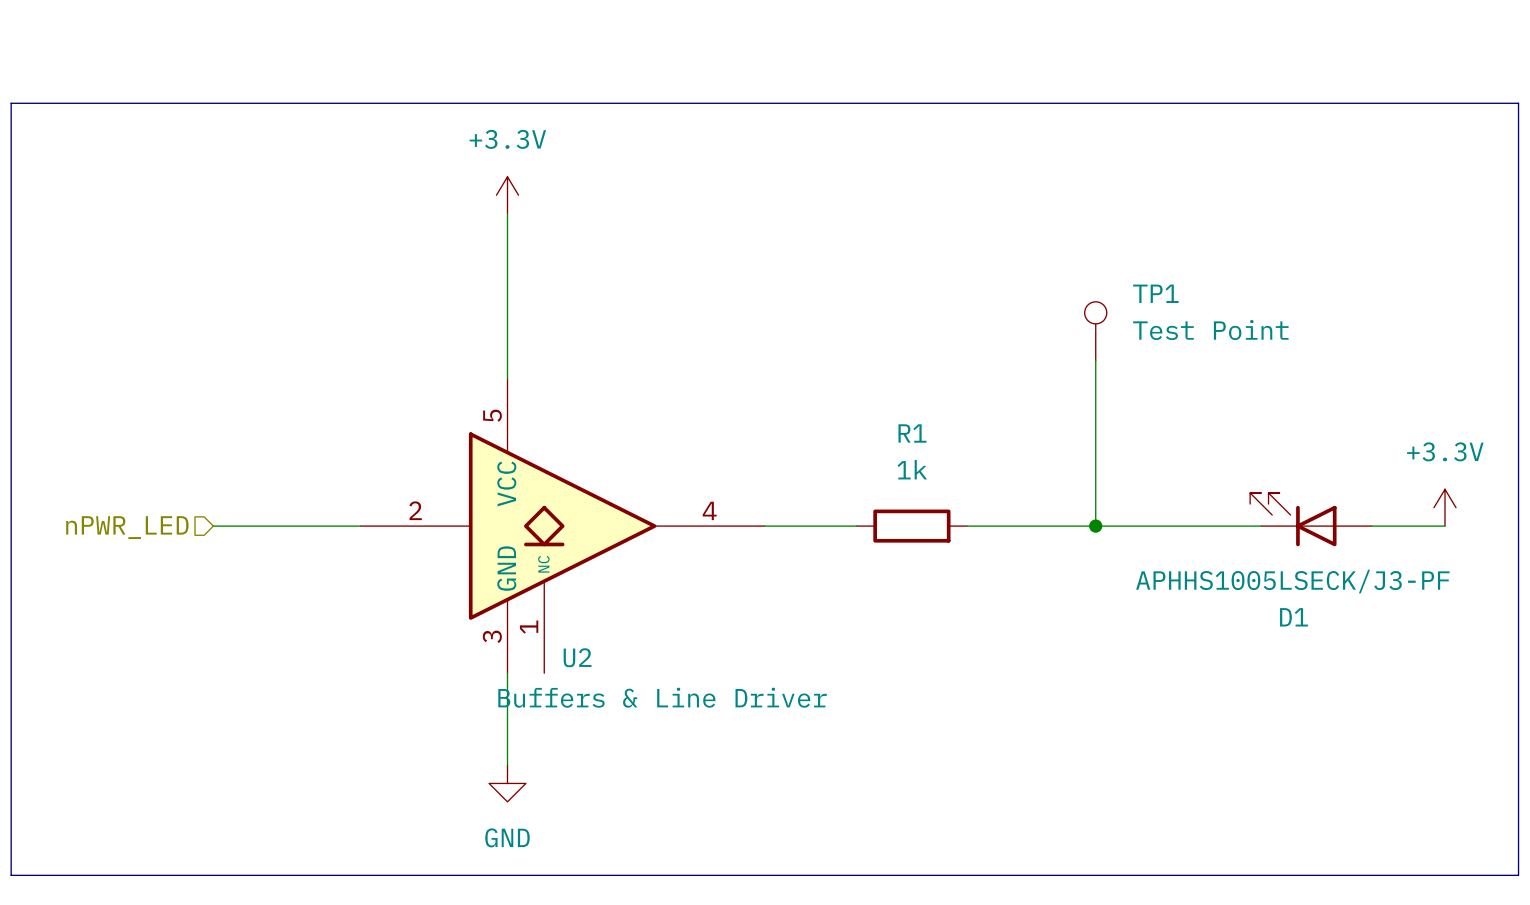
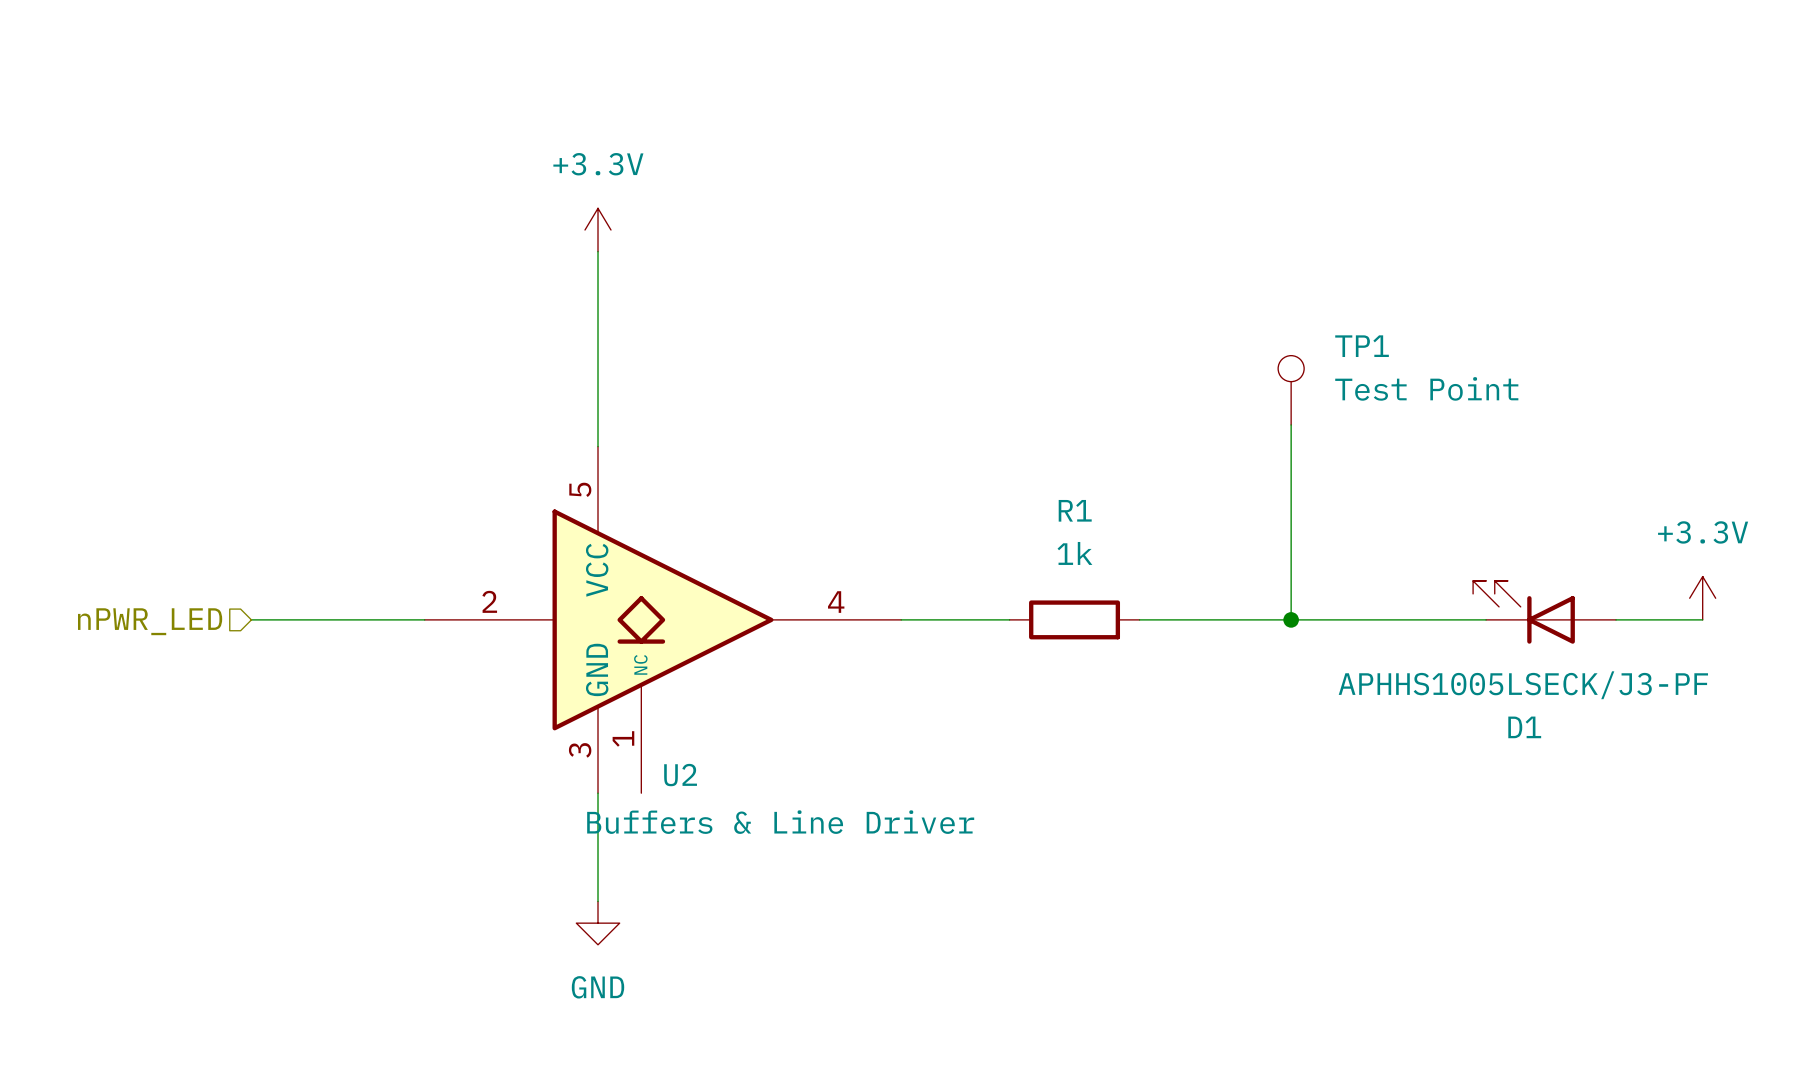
line: (11, 103) (1518, 103) (1518, 875) (11, 875) (11, 103) -> none

